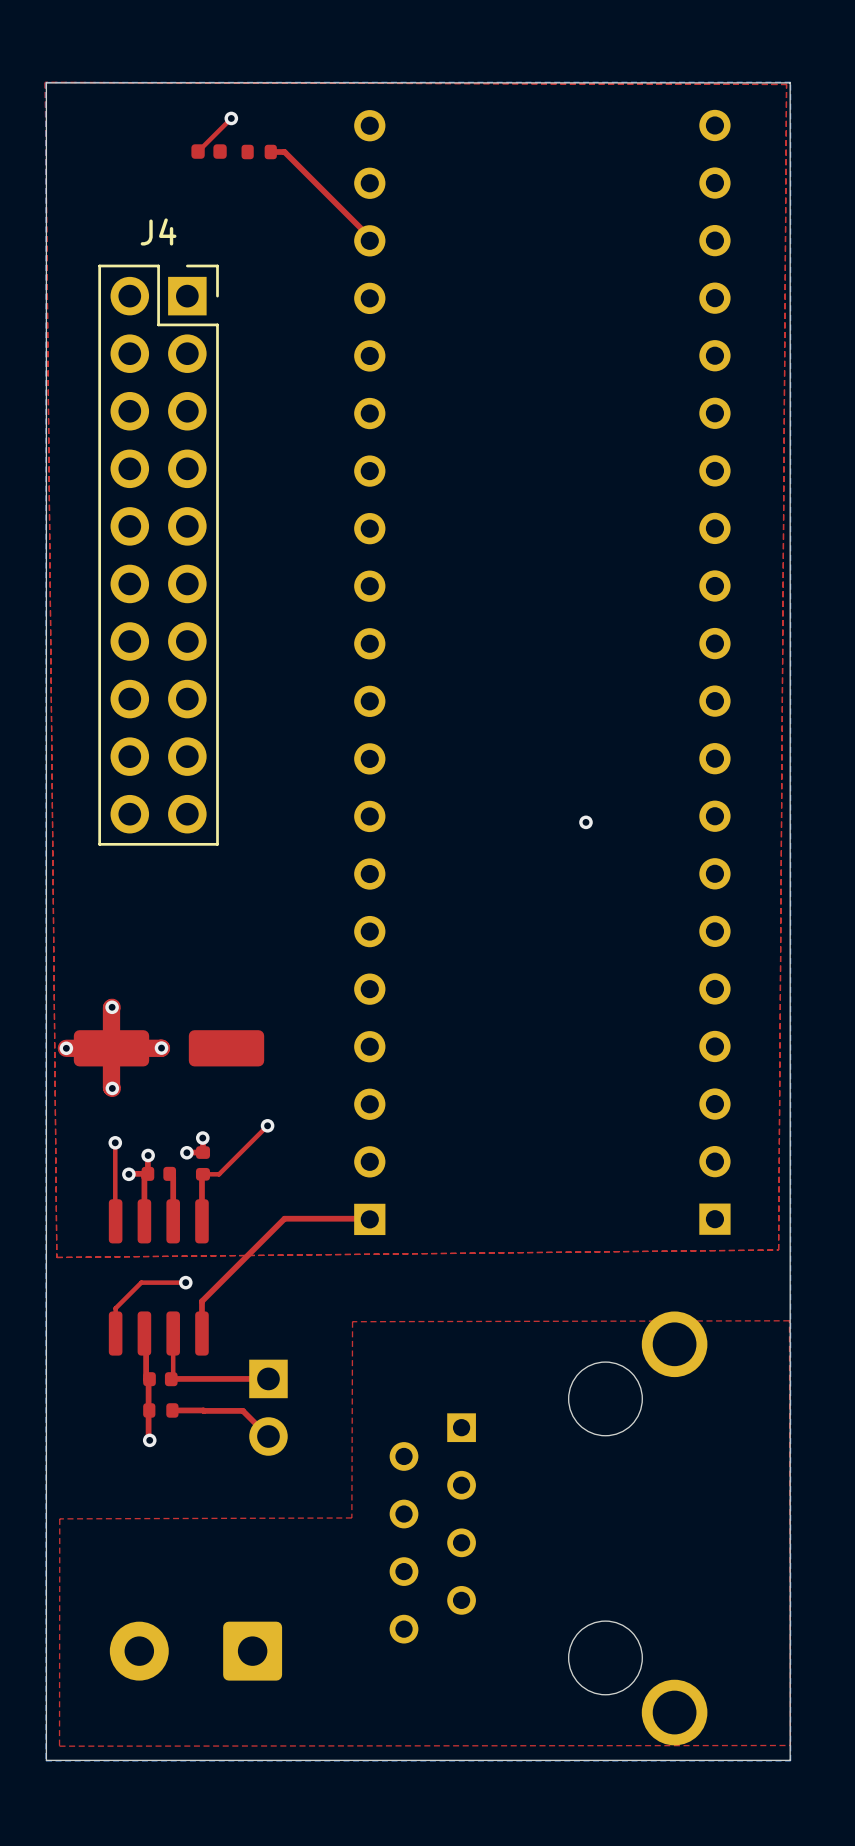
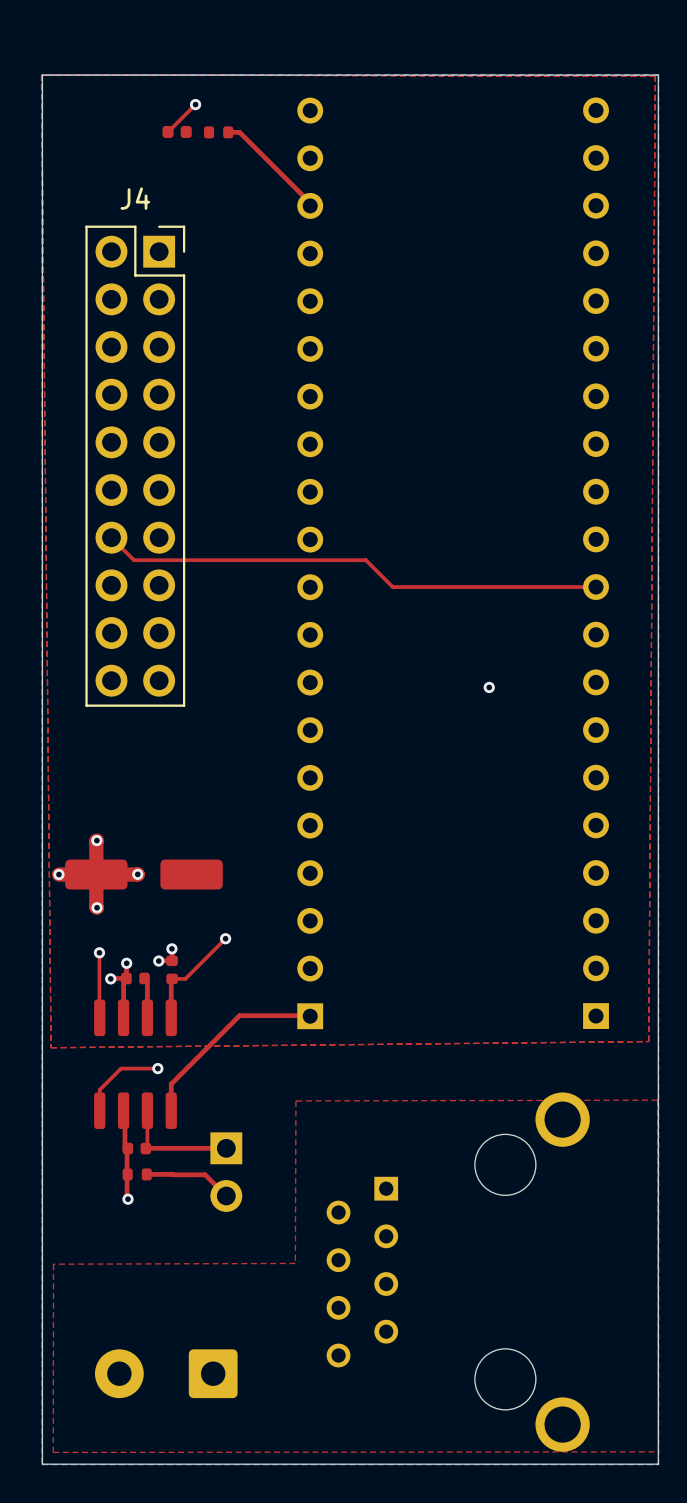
top track: none -> (111, 537) (134, 560) (365, 560) (392, 587) (596, 587)

